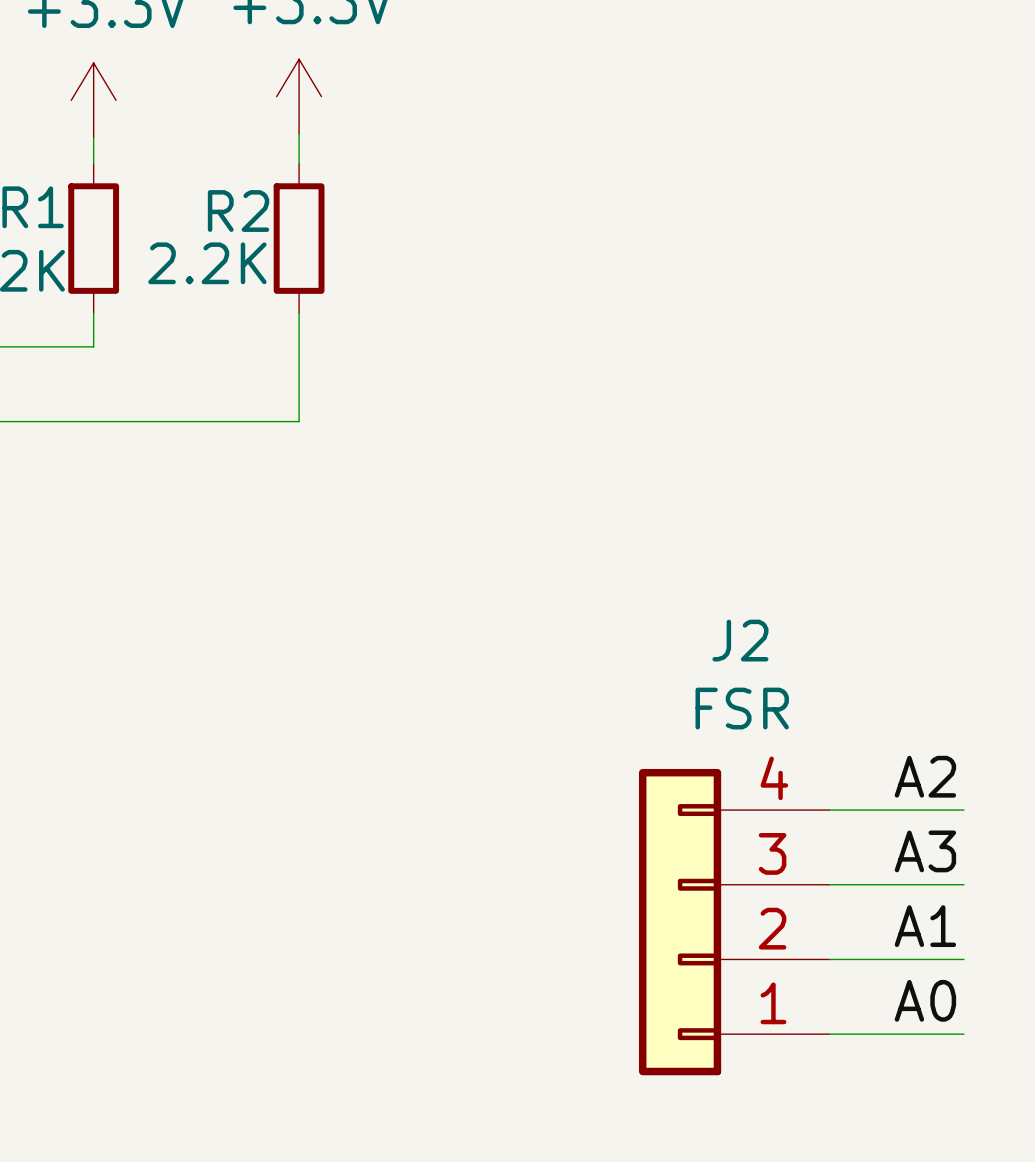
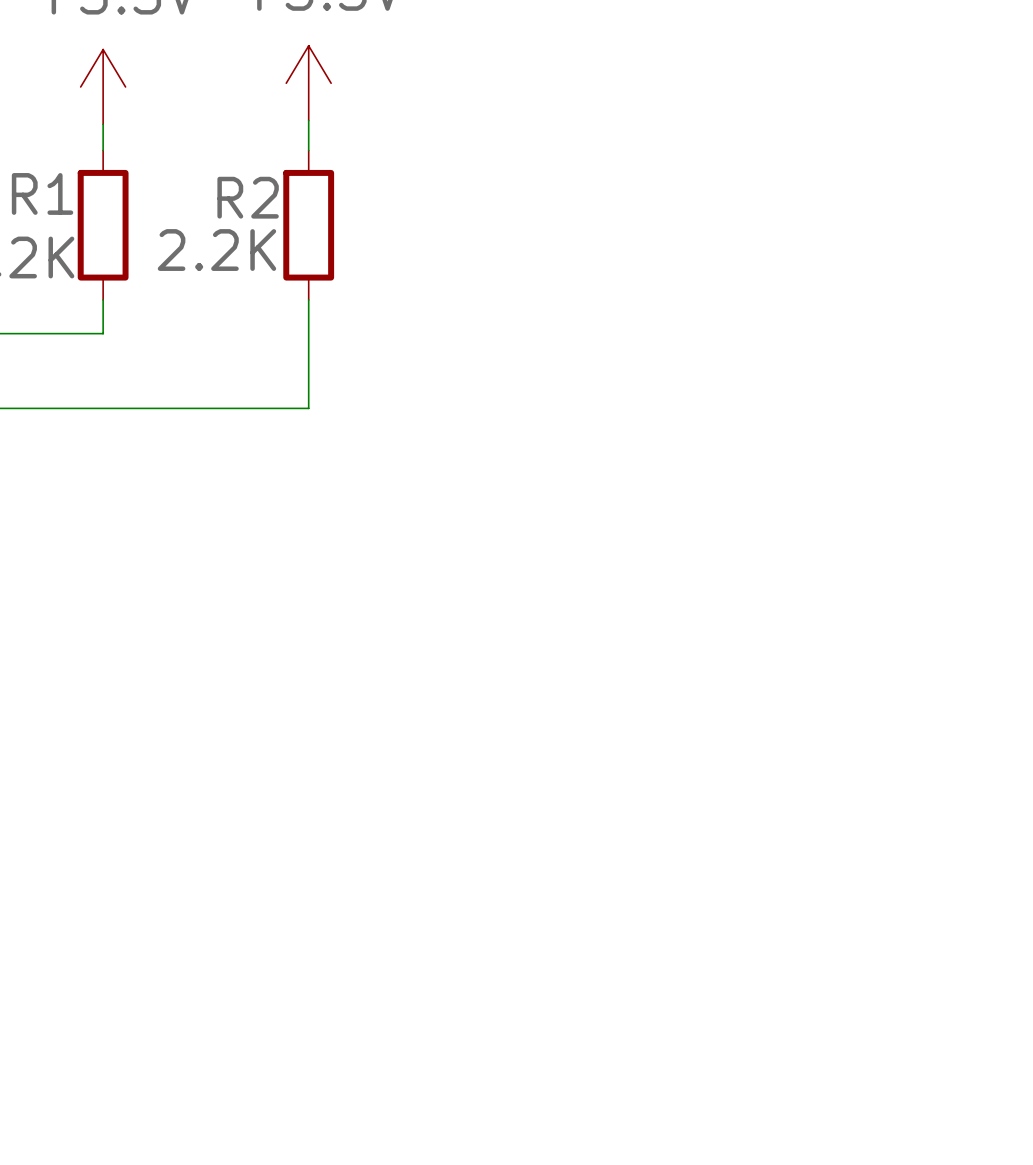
label: A2 (925, 776) -> none
wire: (829, 810) (963, 810) -> none
label: A3 (925, 851) -> none
wire: (829, 884) (963, 884) -> none
J2: FSR (734, 922) -> none
label: A1 (925, 926) -> none
wire: (829, 959) (963, 959) -> none
label: A0 (925, 1000) -> none
wire: (829, 1034) (963, 1034) -> none

